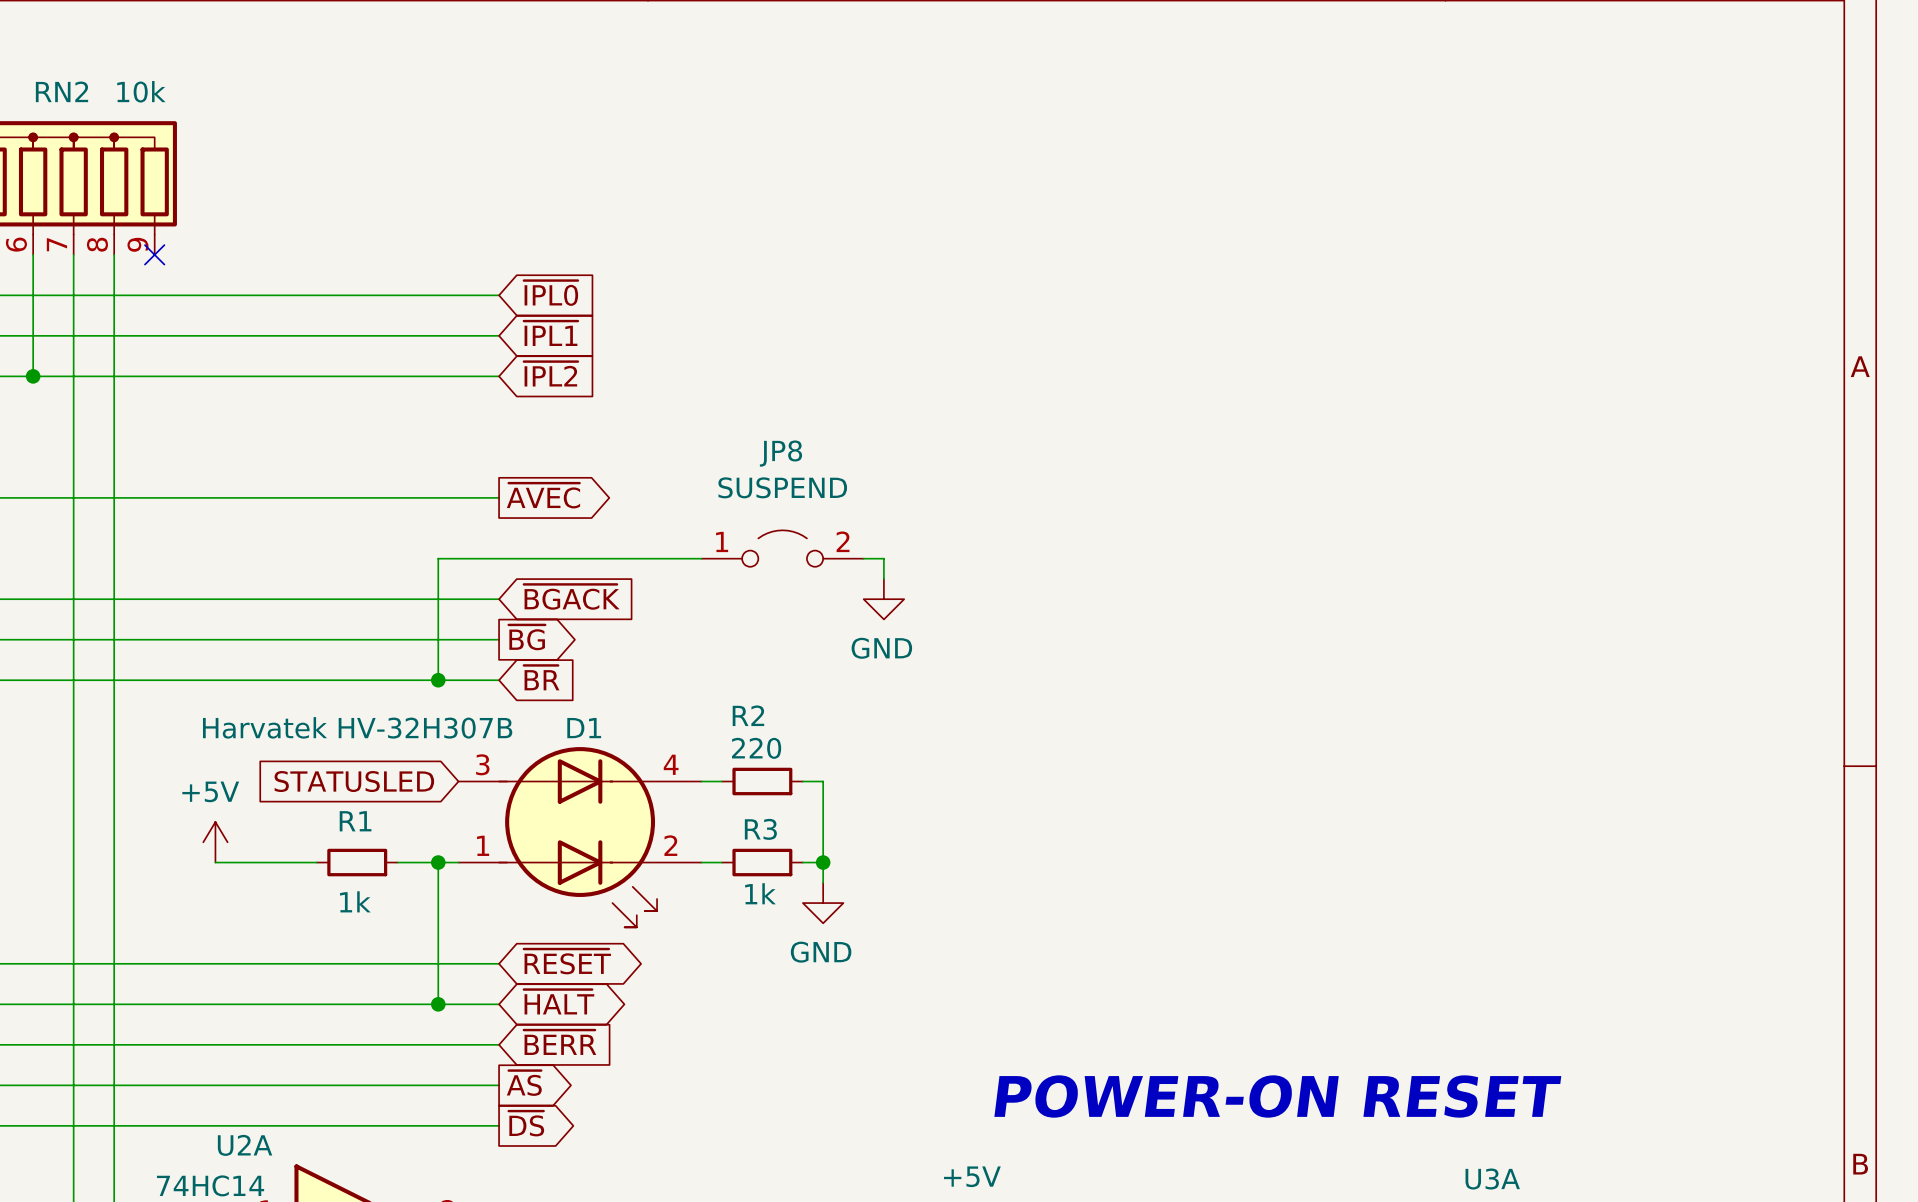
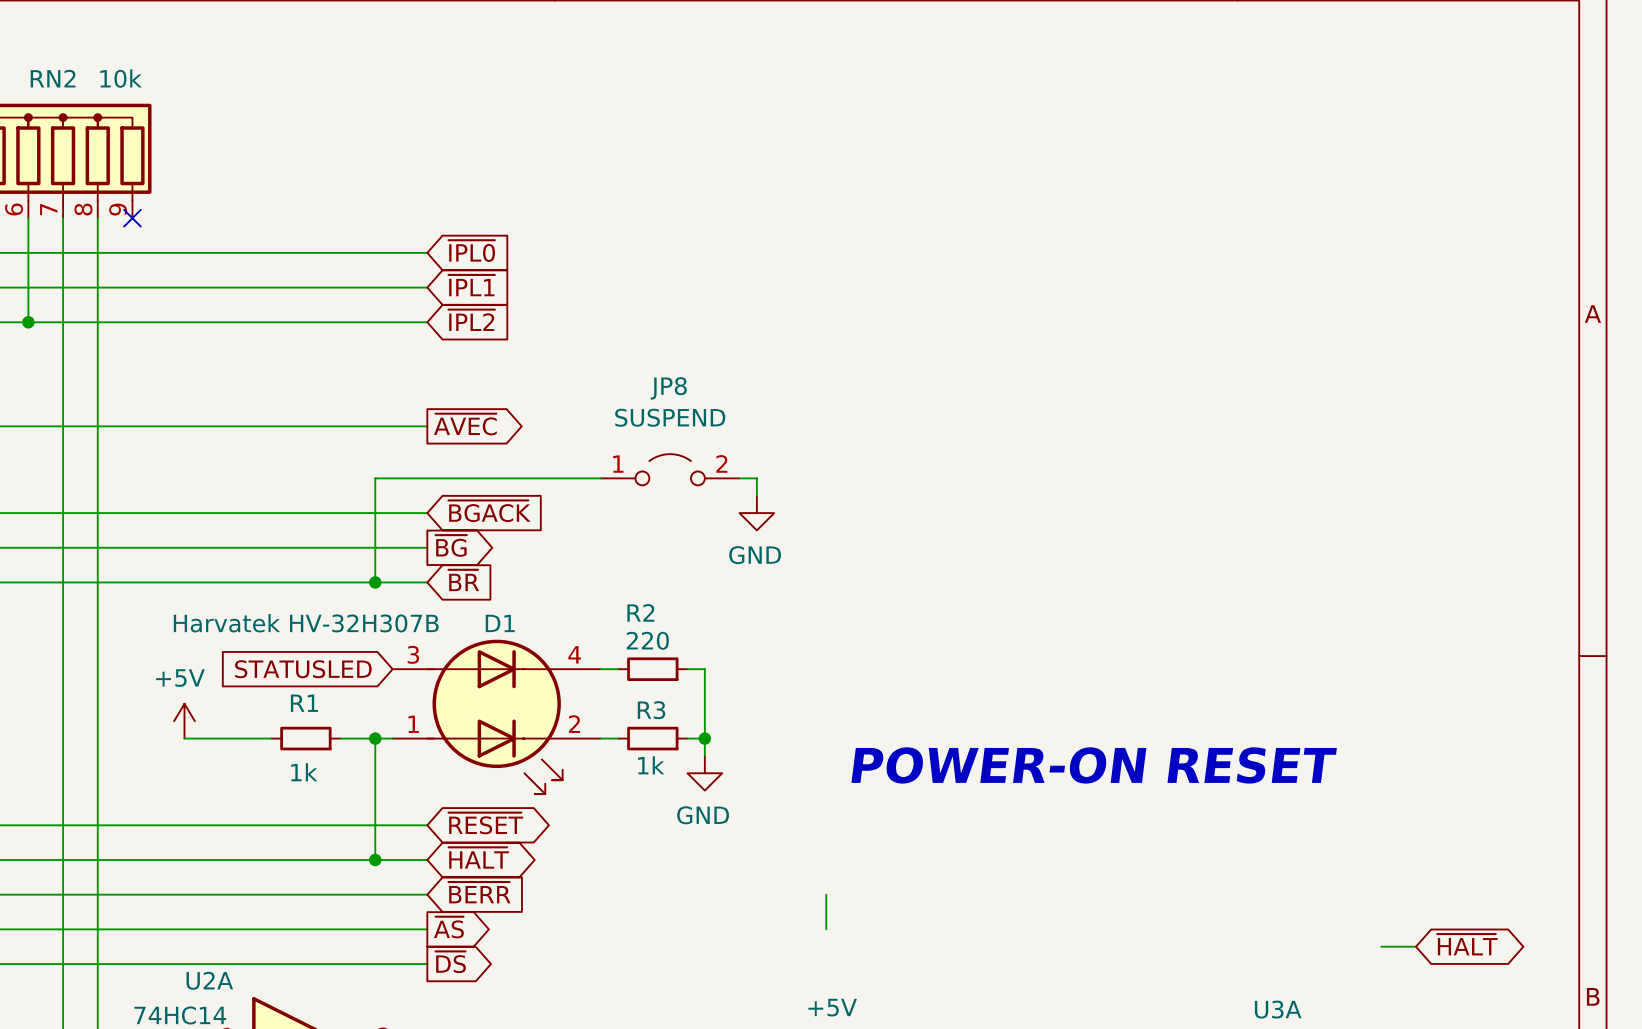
wire: none -> (826, 894) (826, 929)
text position: POWER-ON RESET (1277, 1096) -> POWER-ON RESET (1094, 765)
global label: none -> ~{HALT} (1467, 944)
wire: none -> (1381, 946) (1416, 946)

